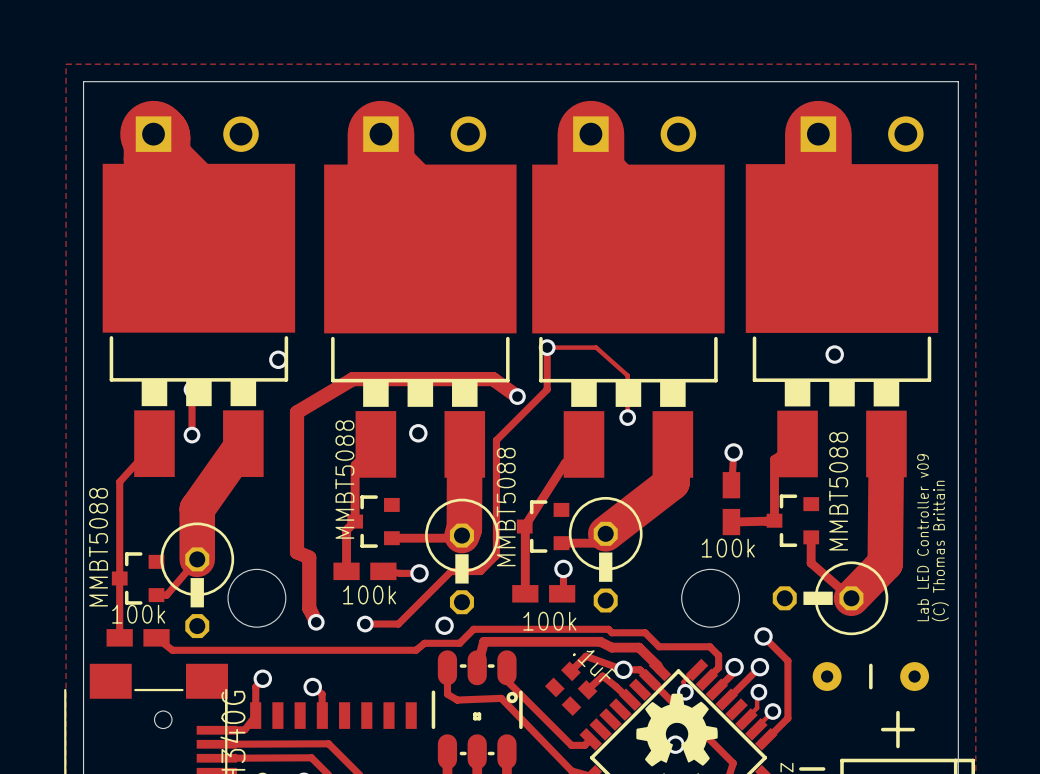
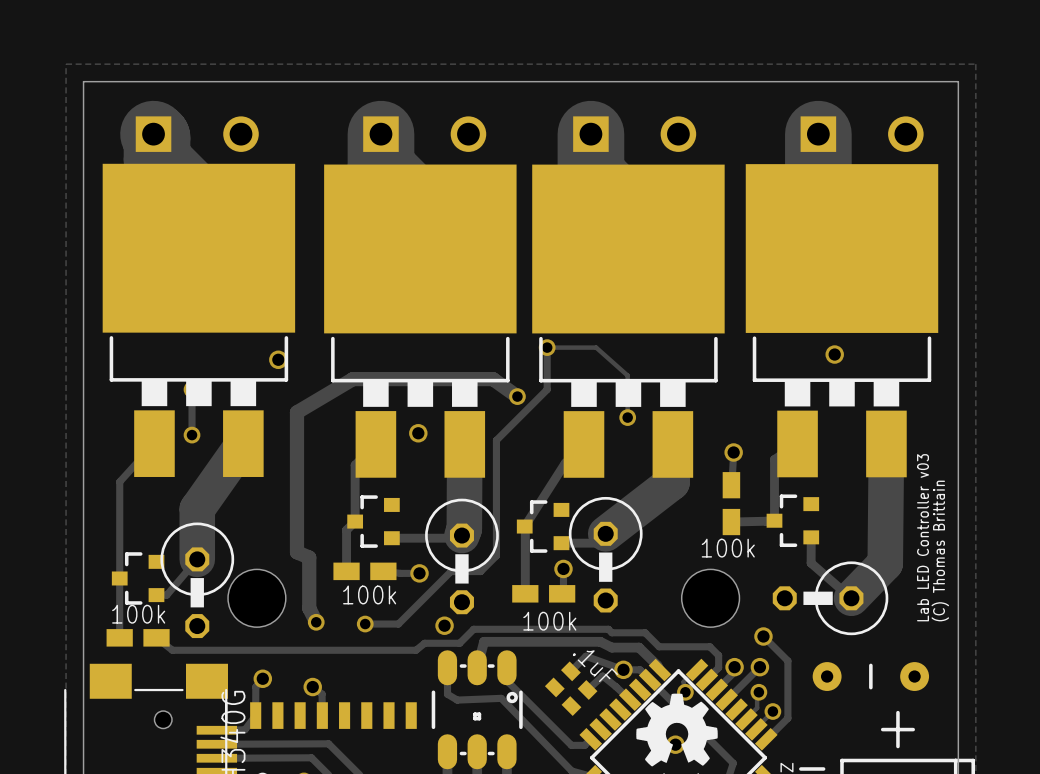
text: MMBT5088 (344, 479) -> none
text: MMBT5088 (838, 491) -> none
text: MMBT5088 (506, 507) -> none
text: Lab LED Controller v09 (923, 537) -> Lab LED Controller v03 (923, 537)
text: MMBT5088 (98, 547) -> none

